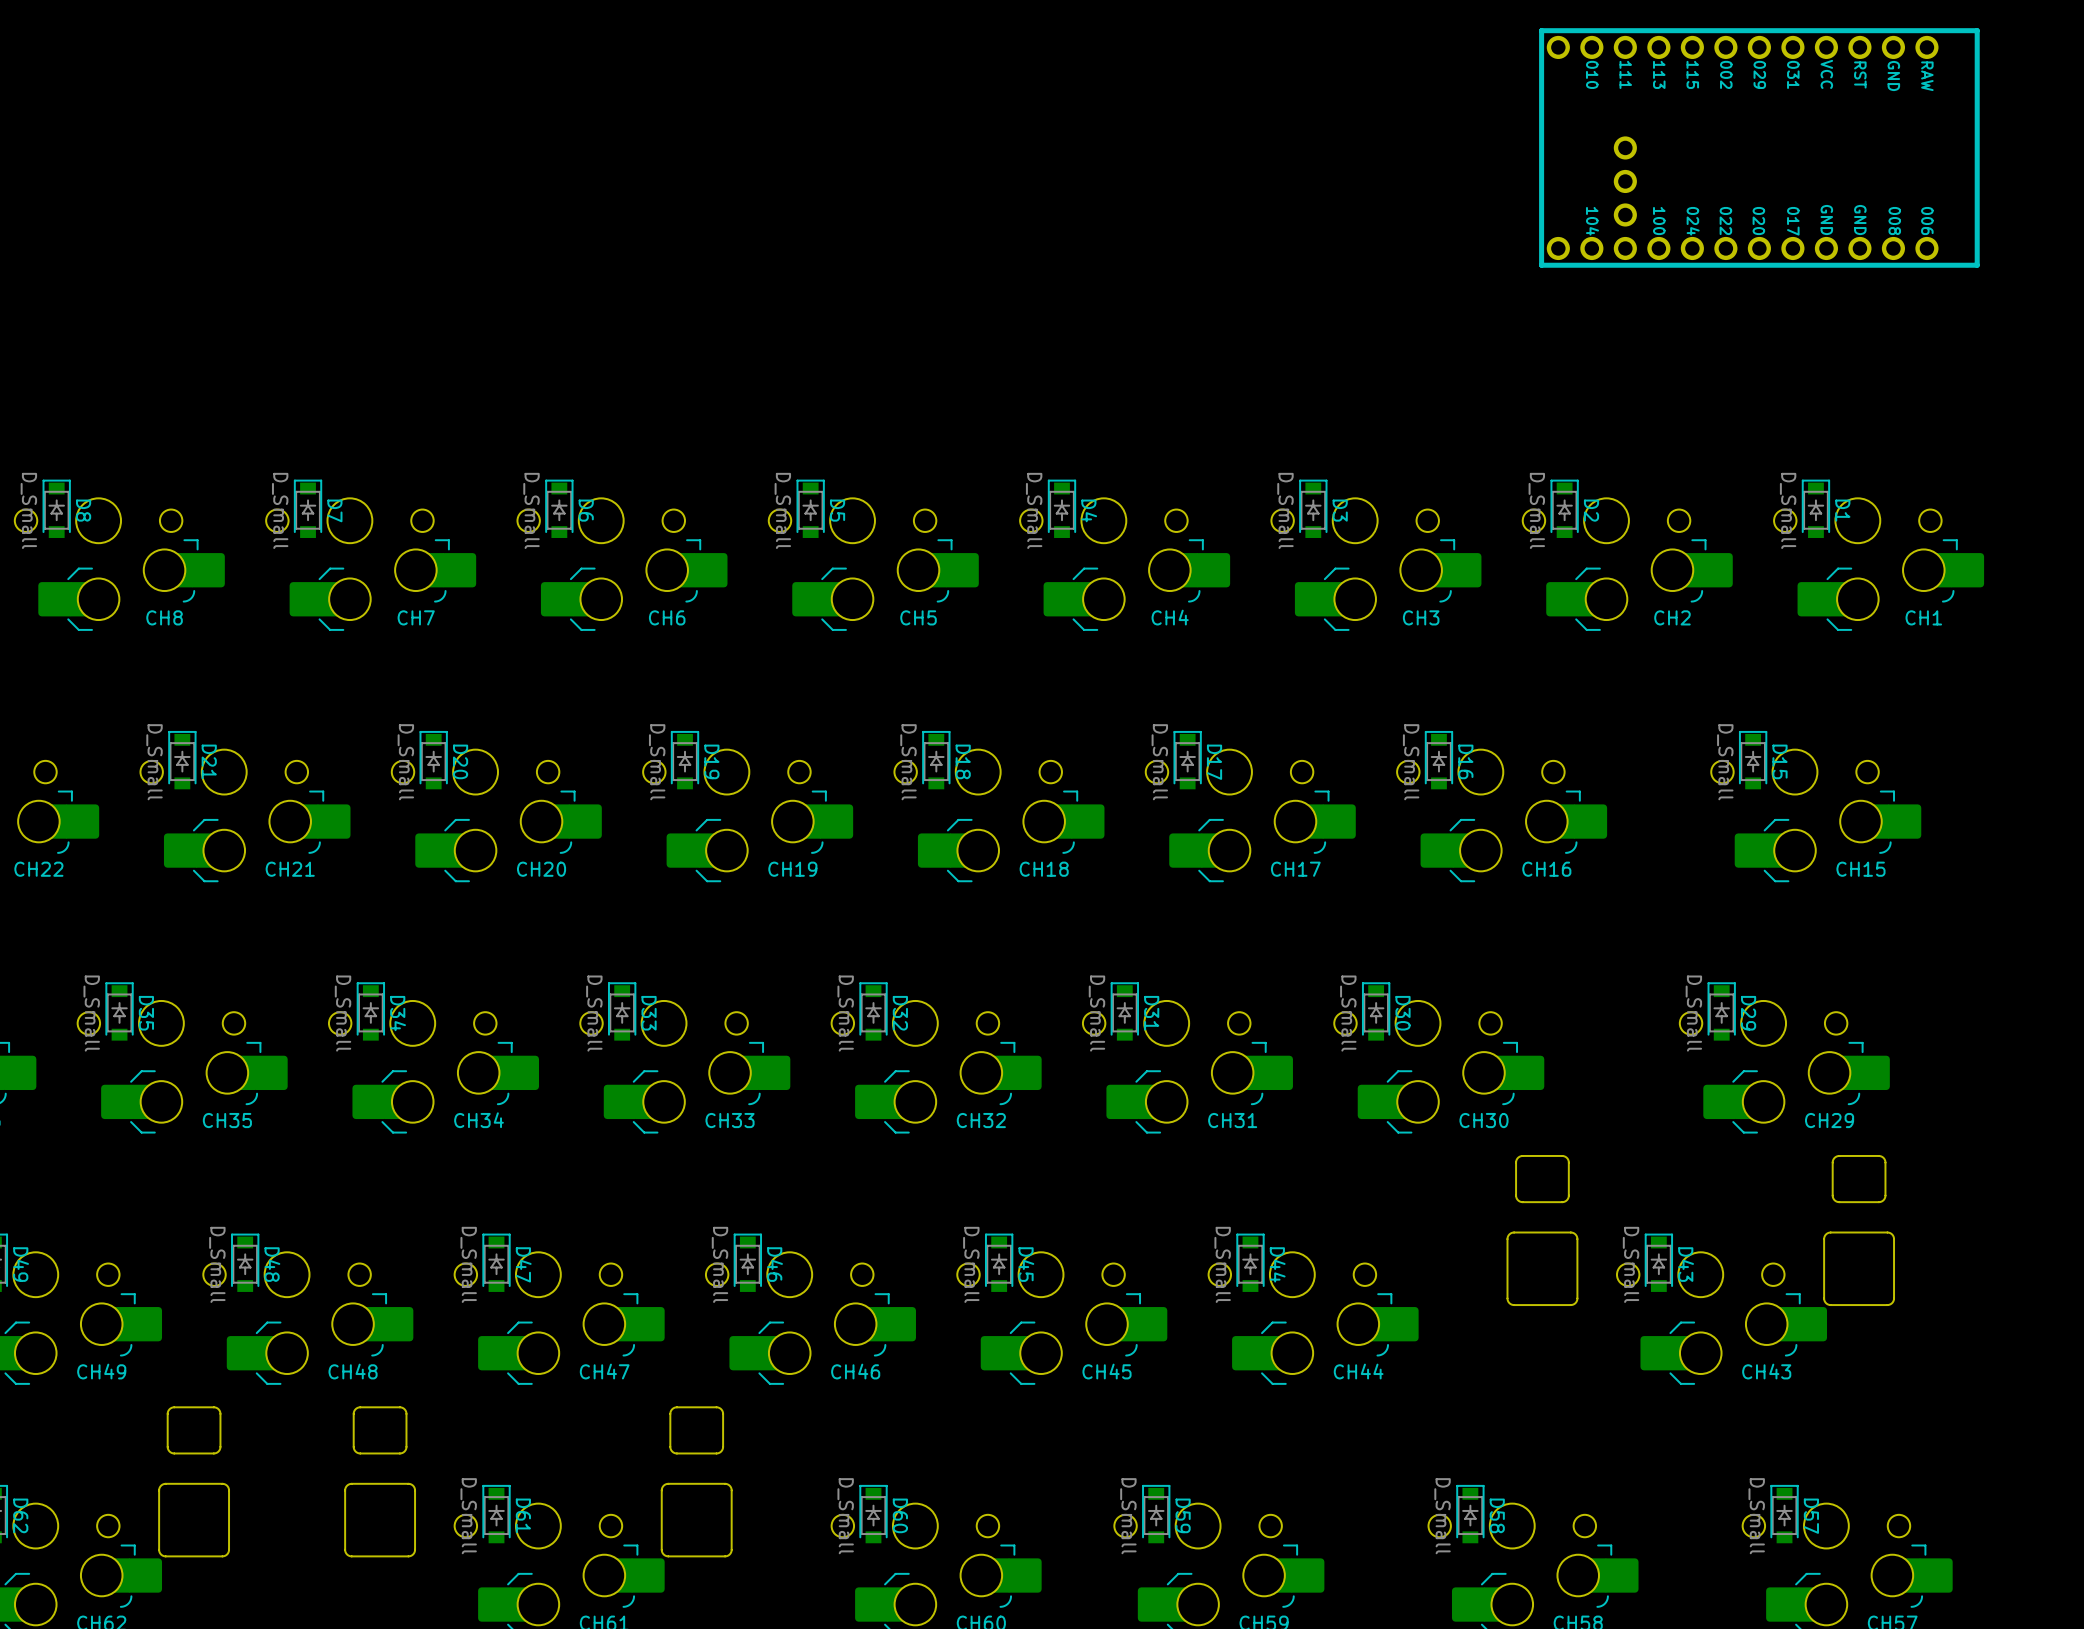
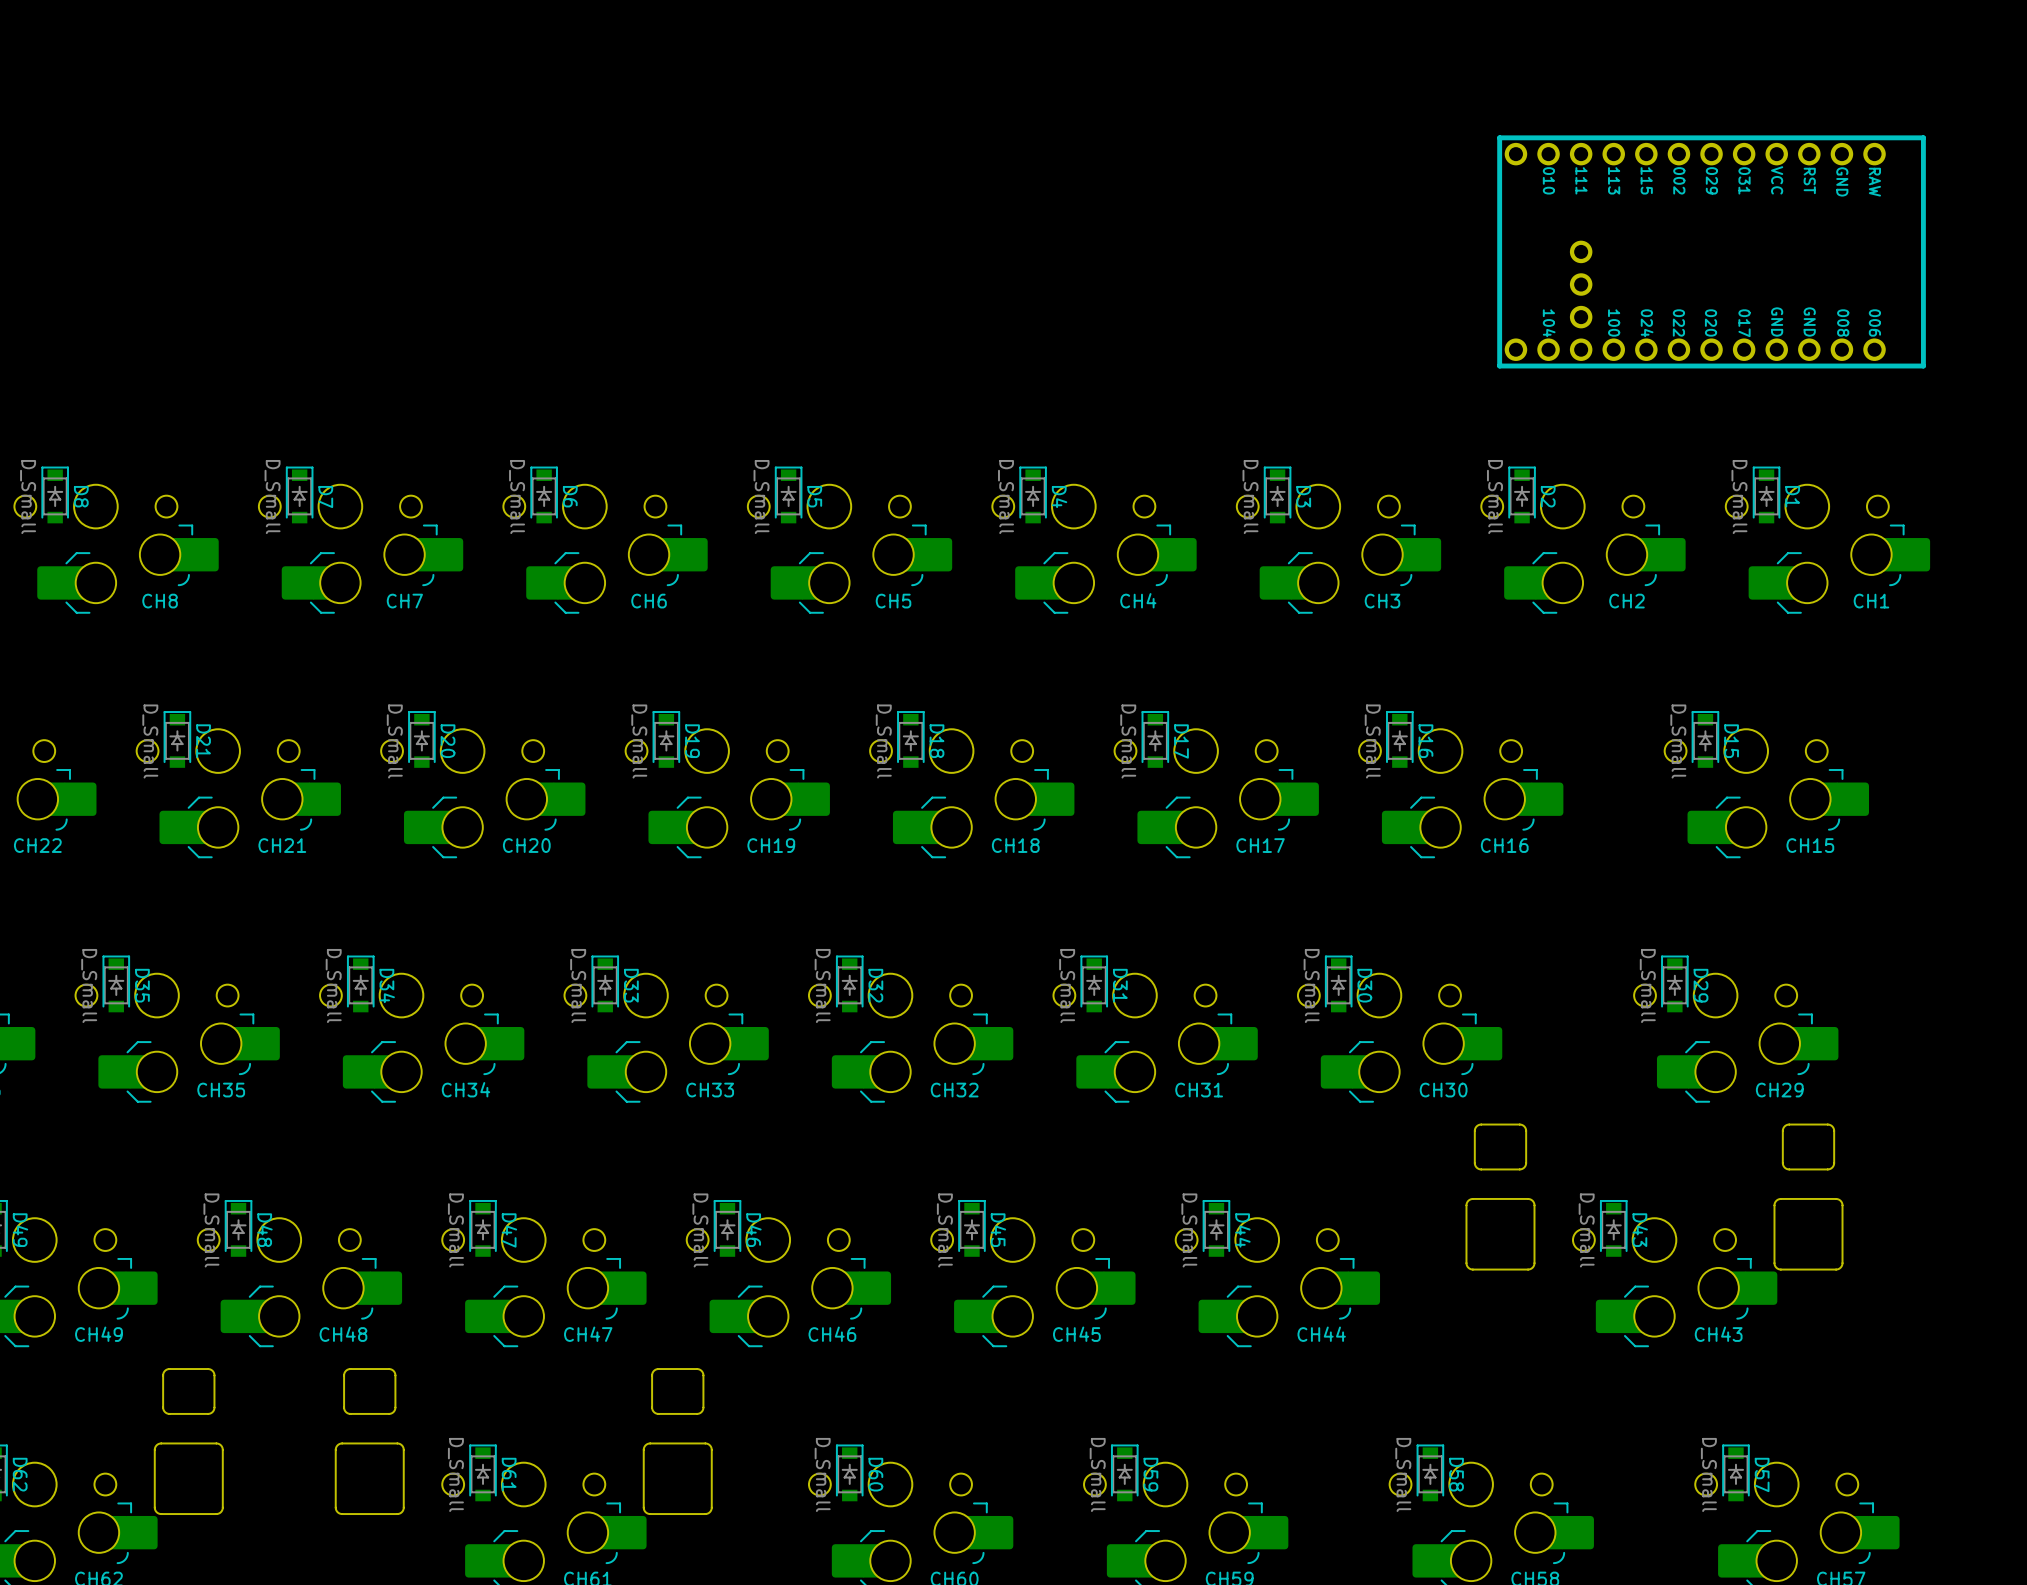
part position: (1759, 147) -> (1711, 251)

